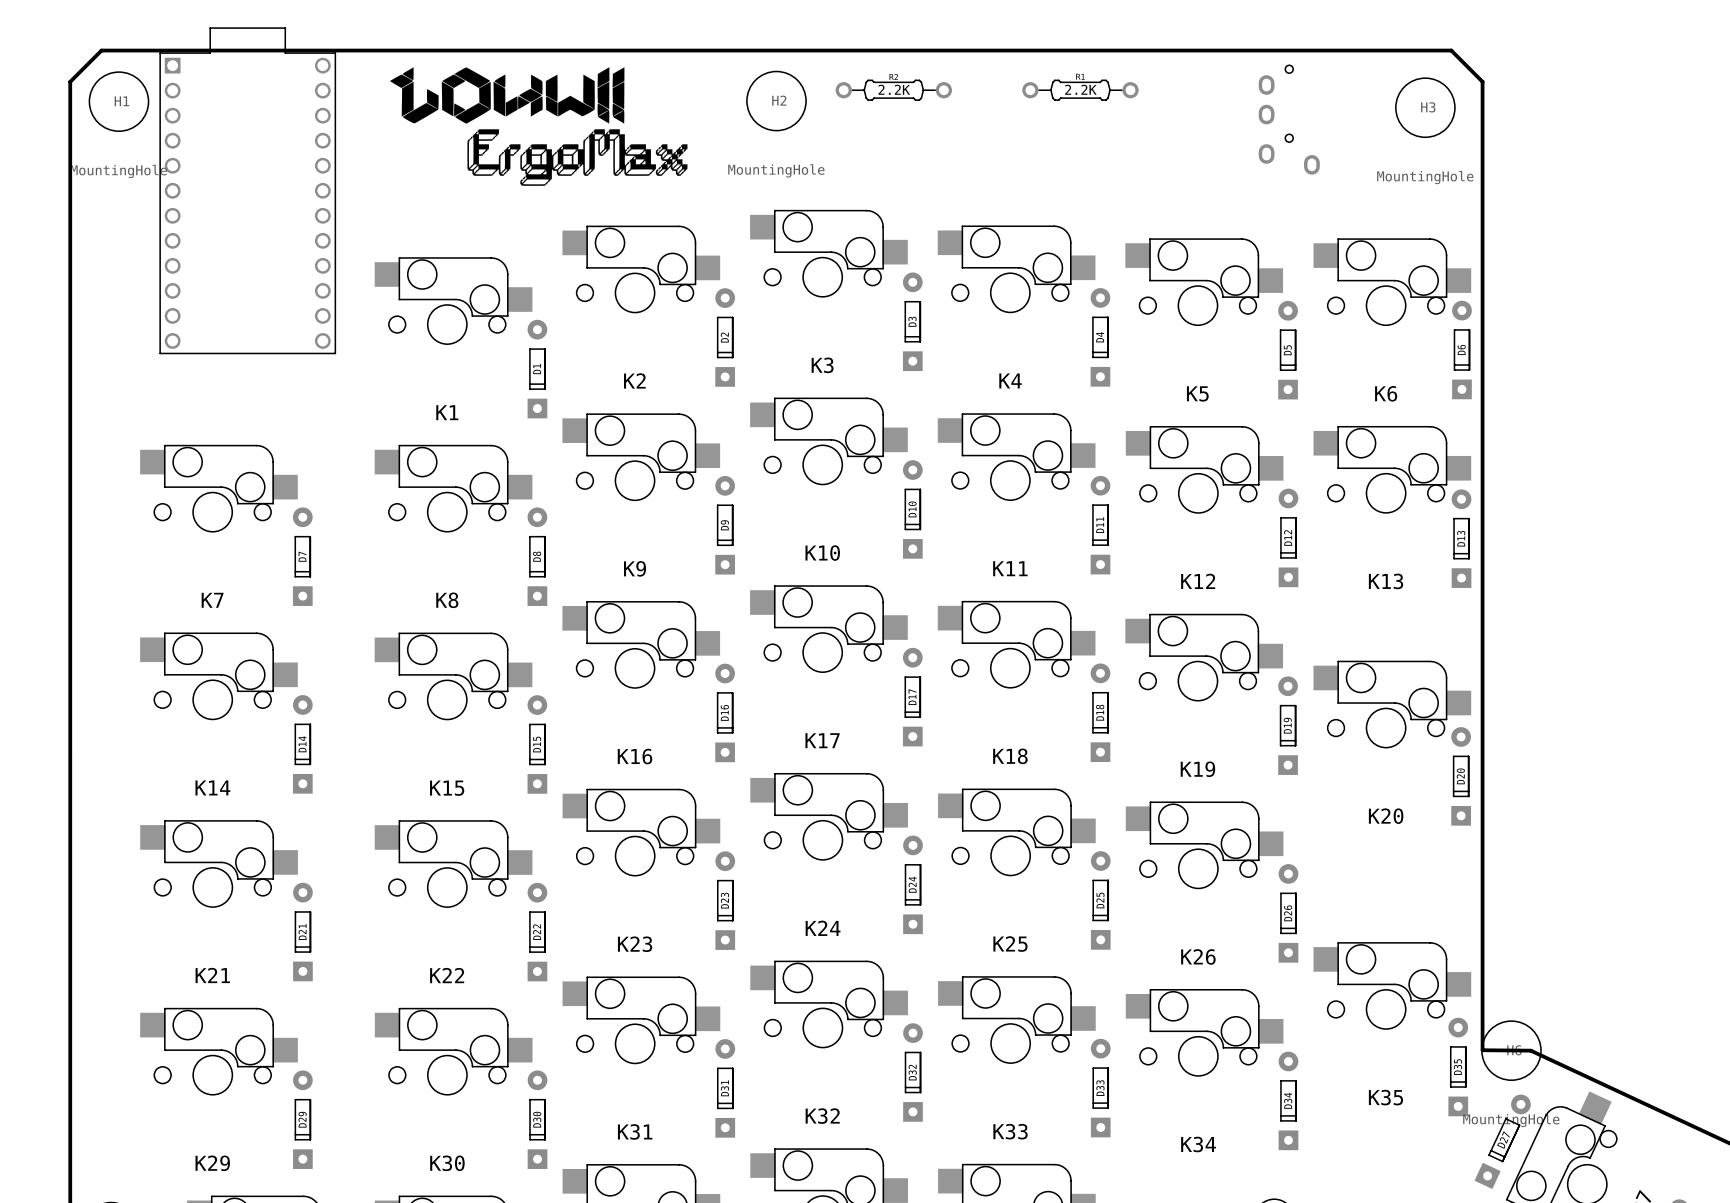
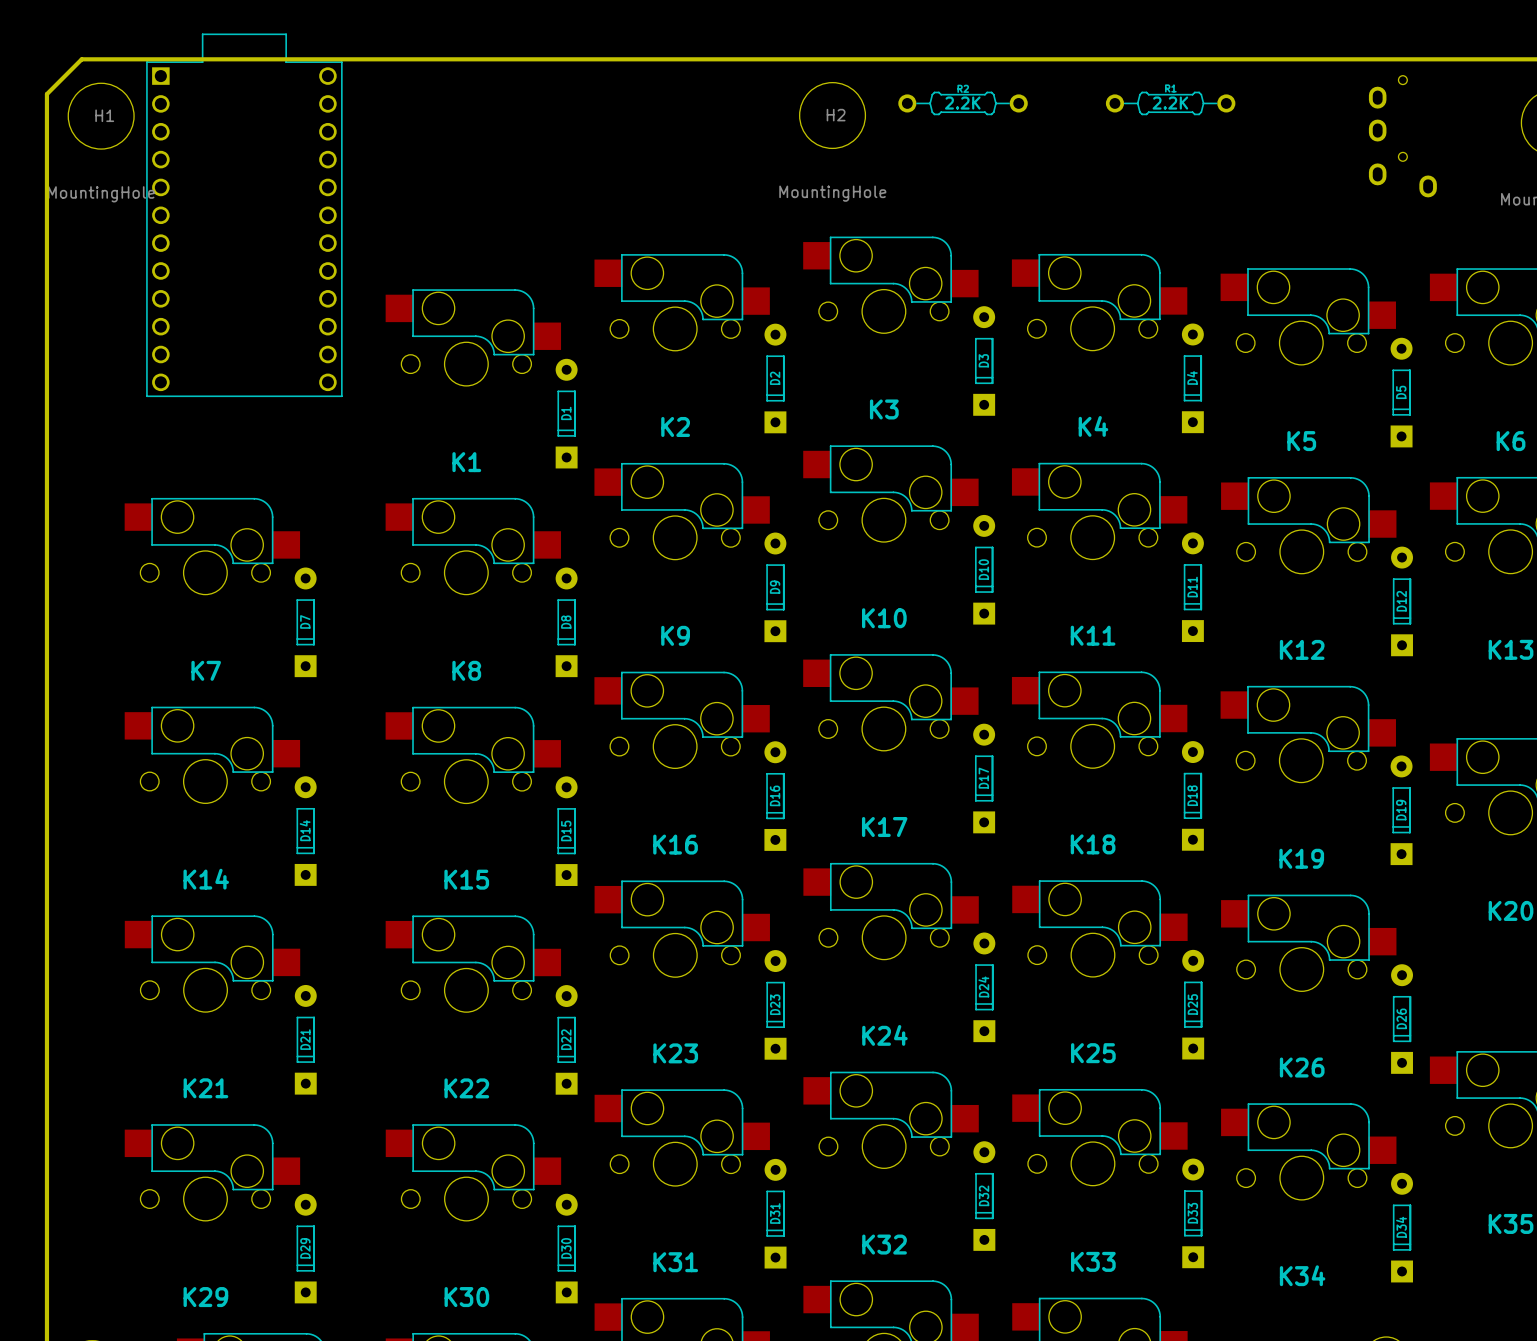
drawing: [390, 67, 688, 186] -> none

